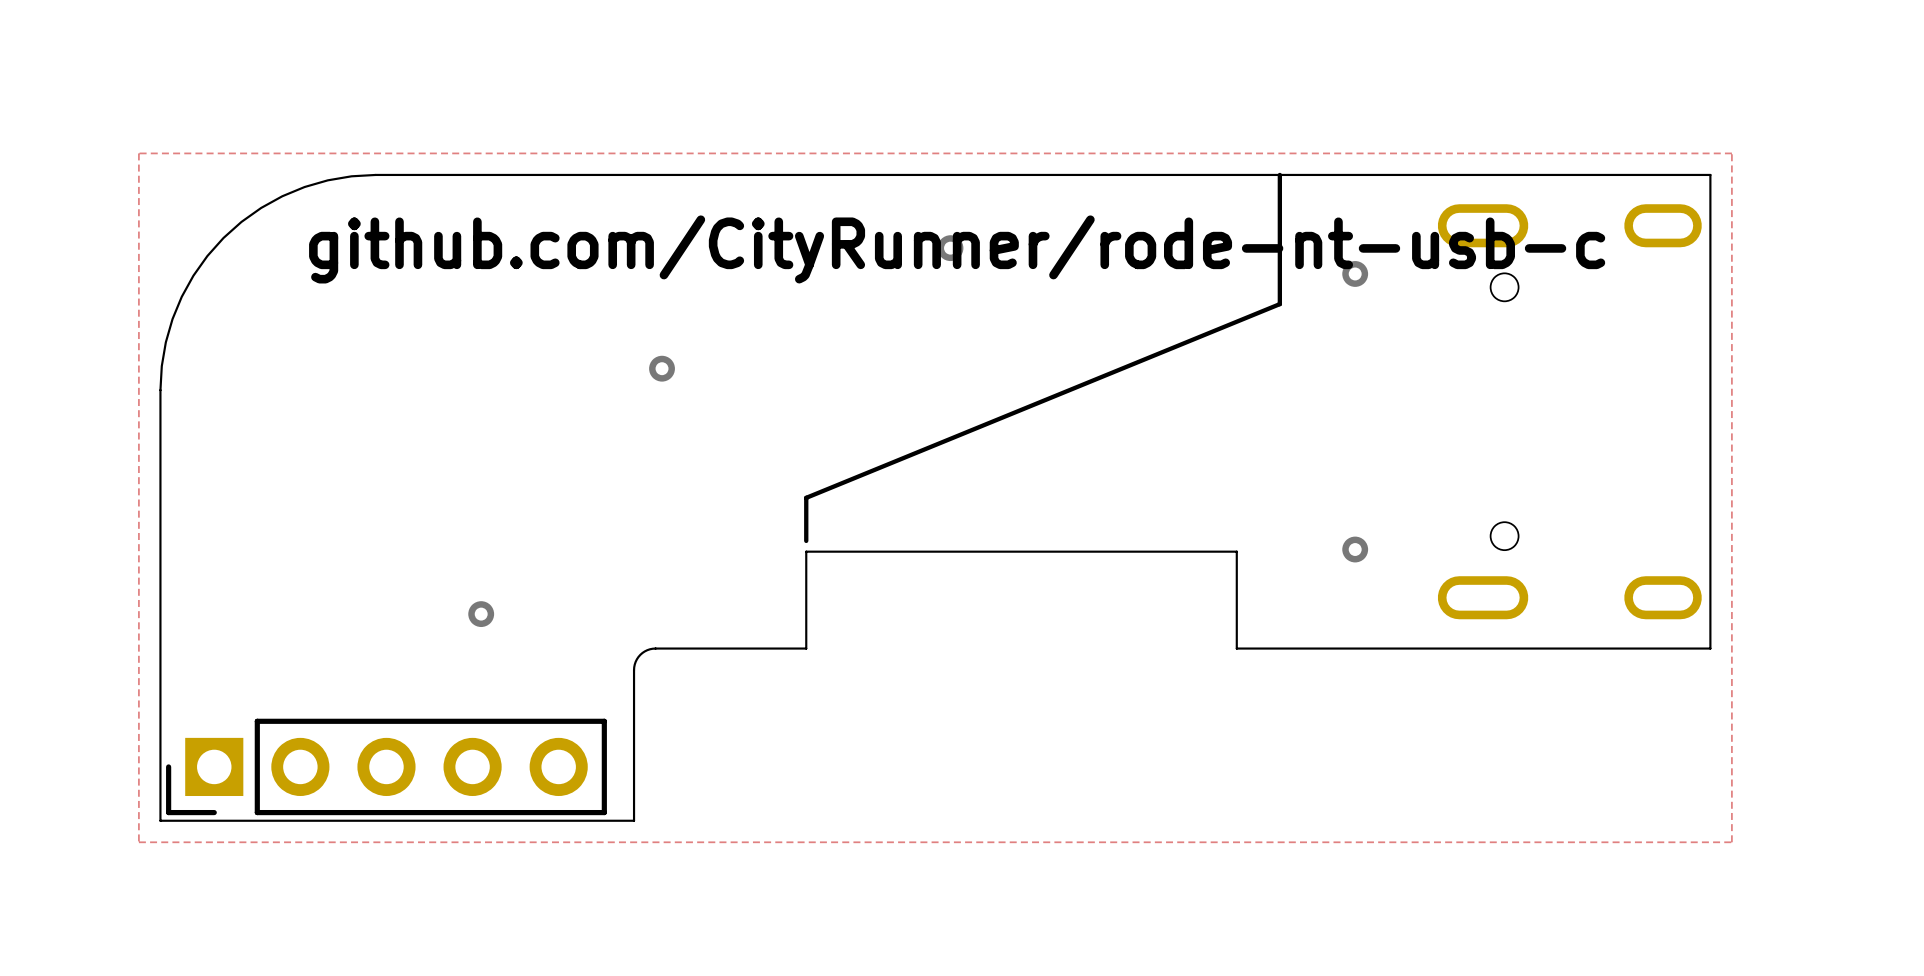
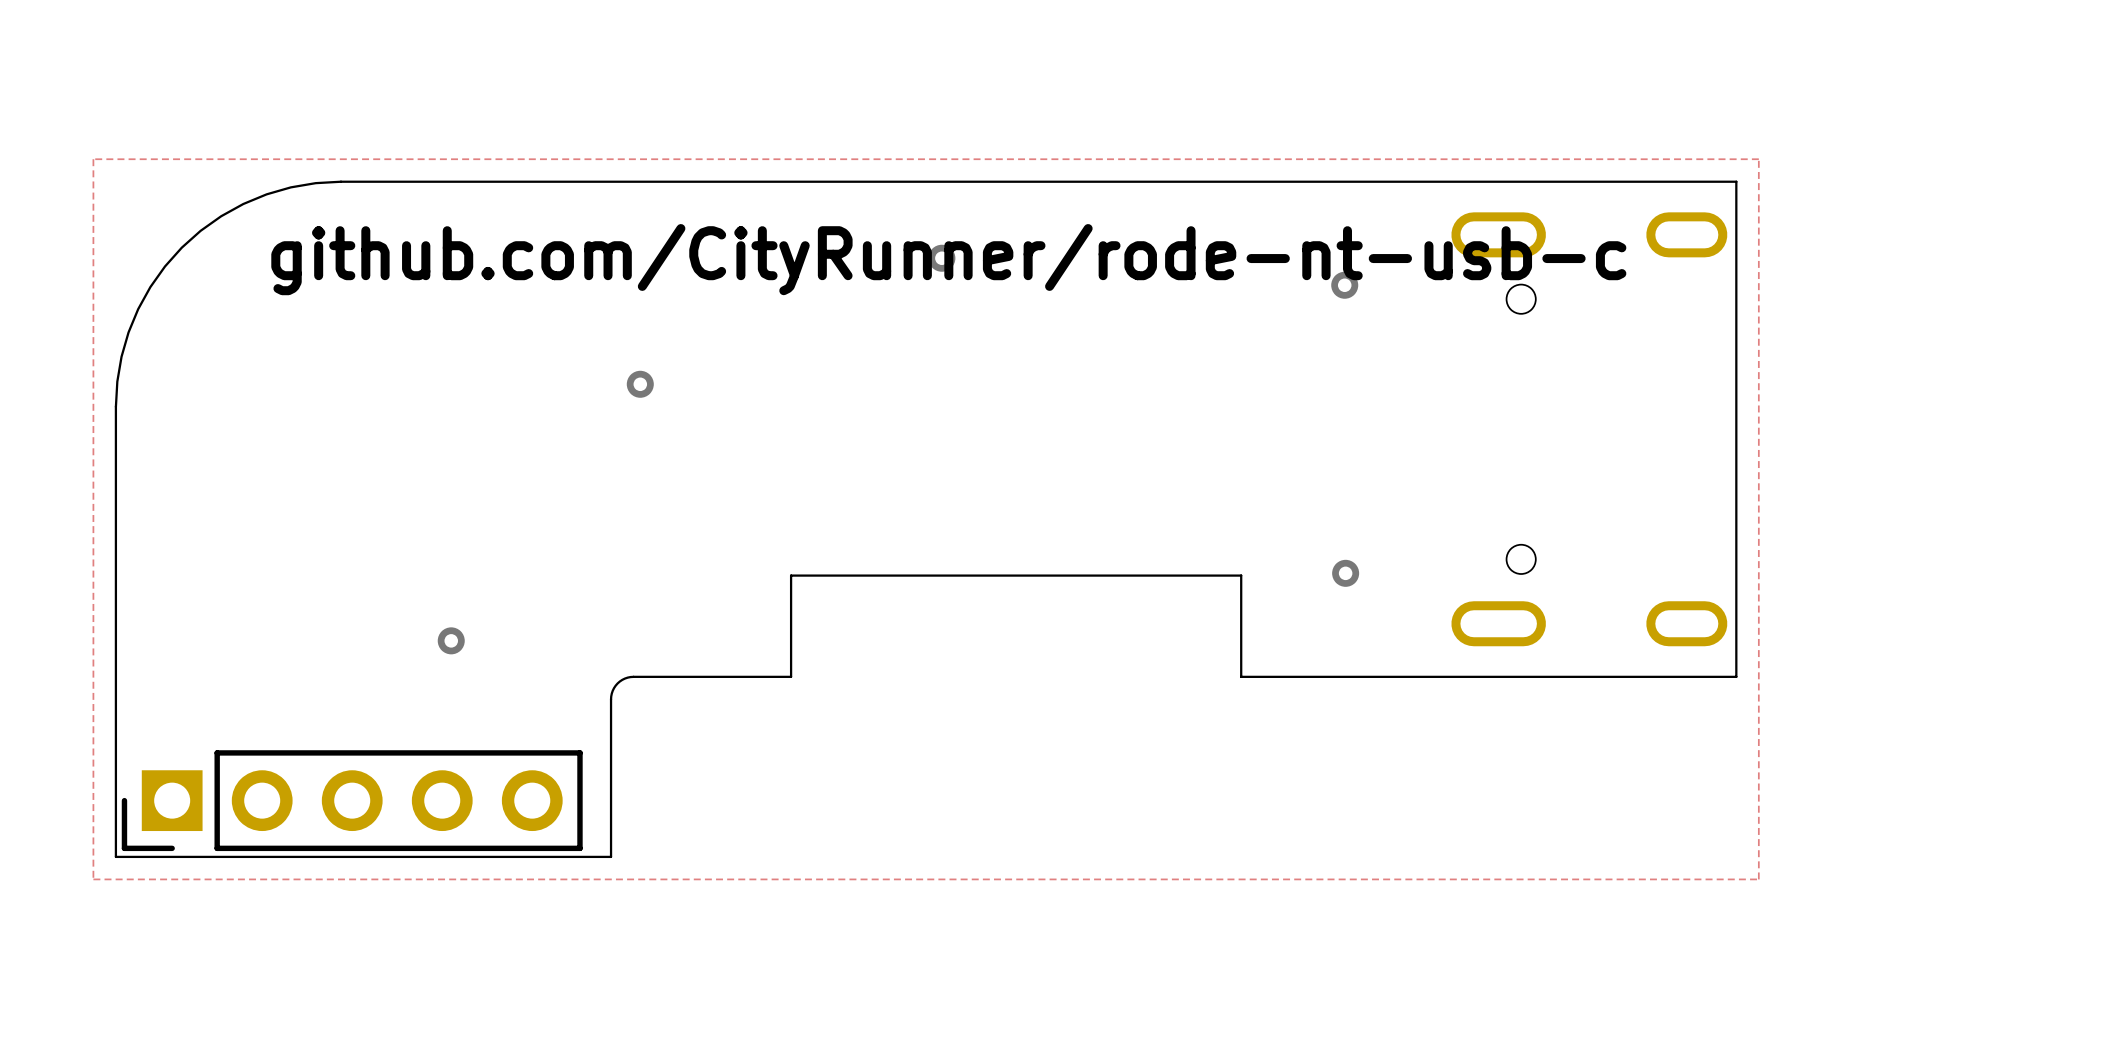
line: (1279, 174) (1279, 304) (806, 497) (806, 540) -> none
via position: (1355, 273) -> (1344, 285)
via position: (1355, 549) -> (1345, 573)

